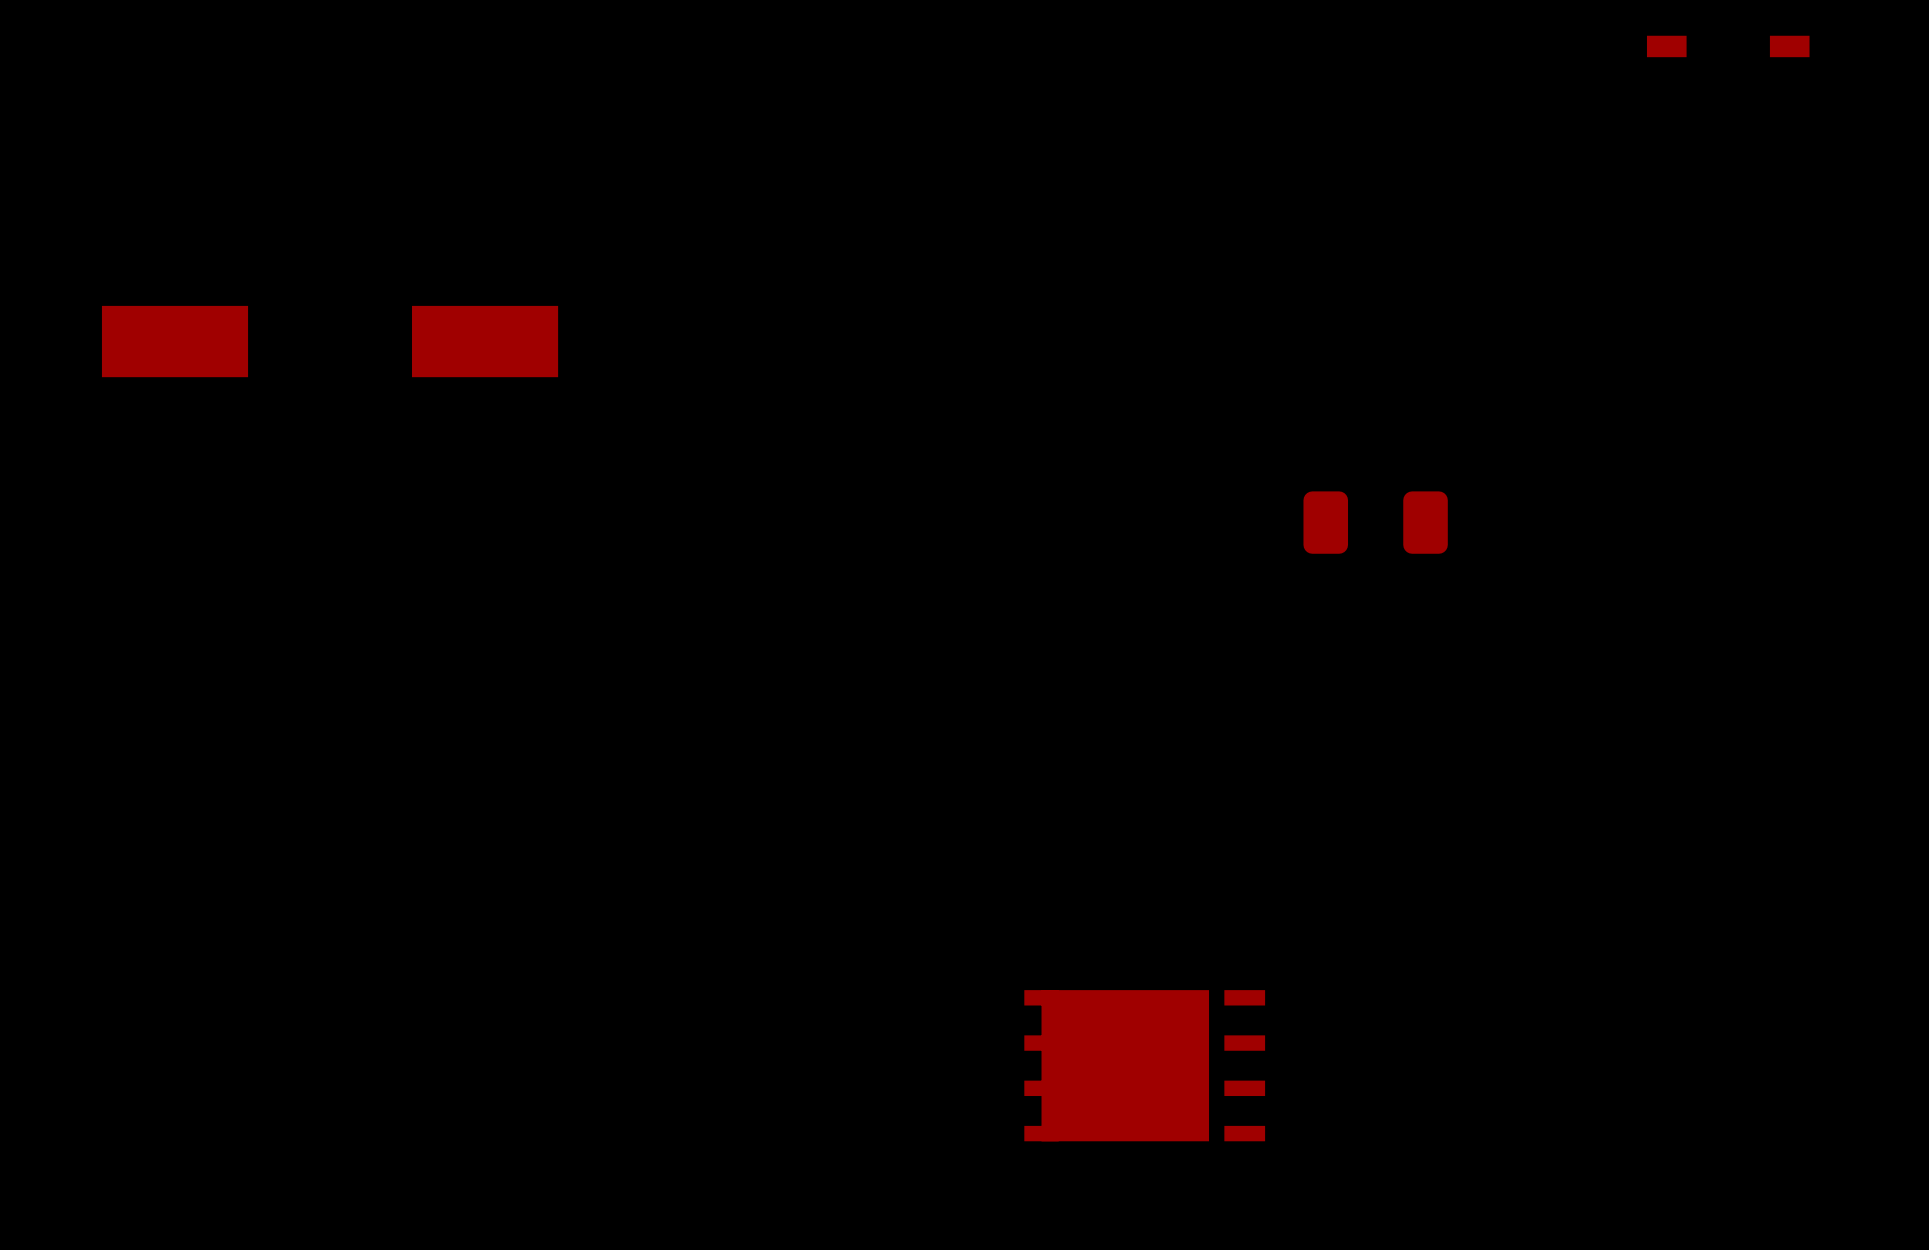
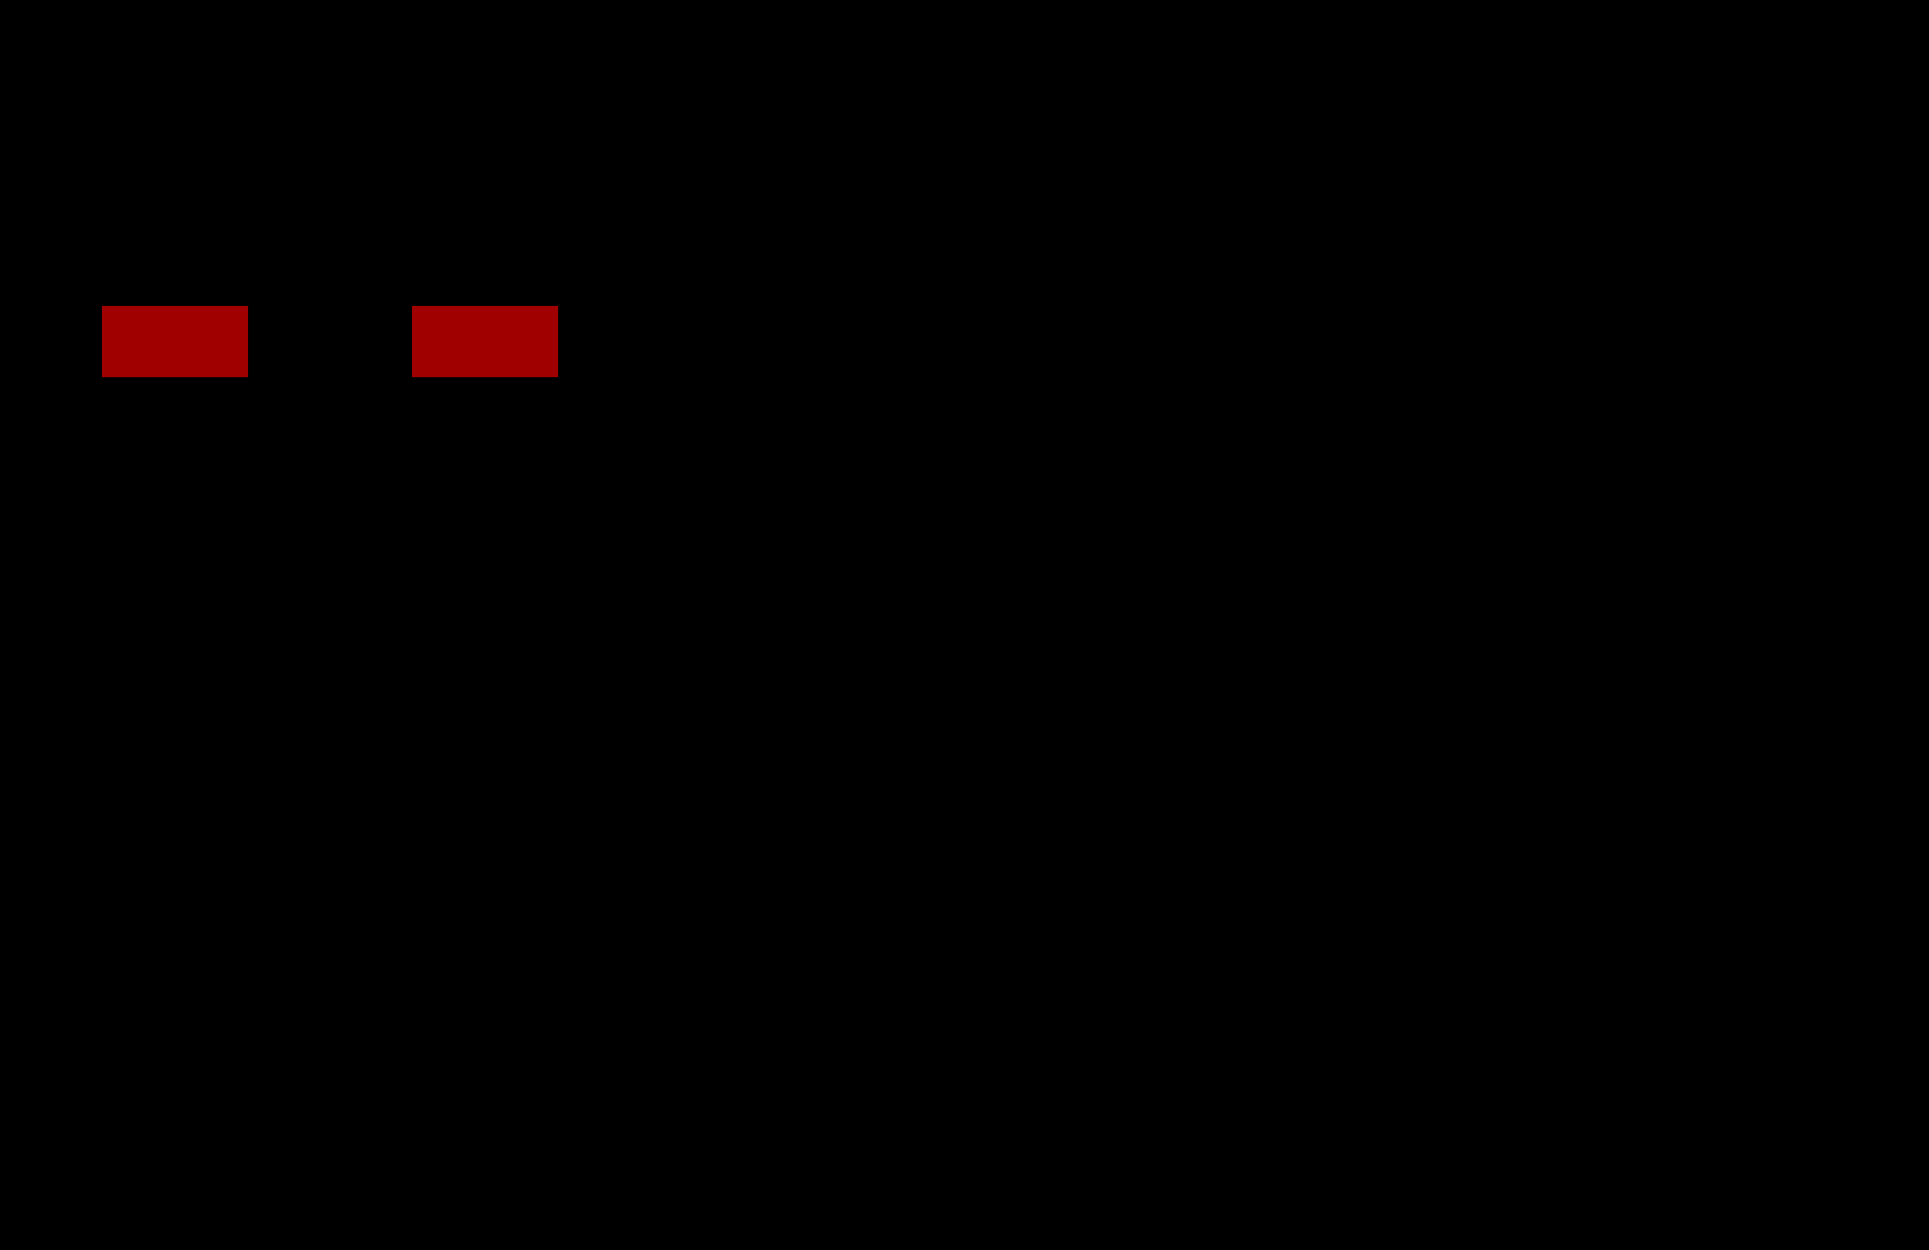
part: (1728, 46) -> none
part: (1375, 522) -> none
part: (1144, 1065) -> none

